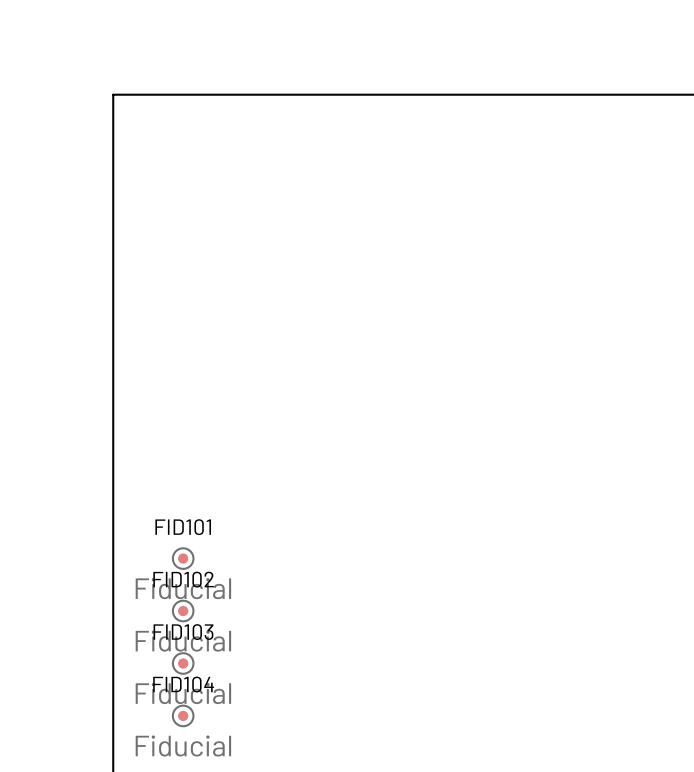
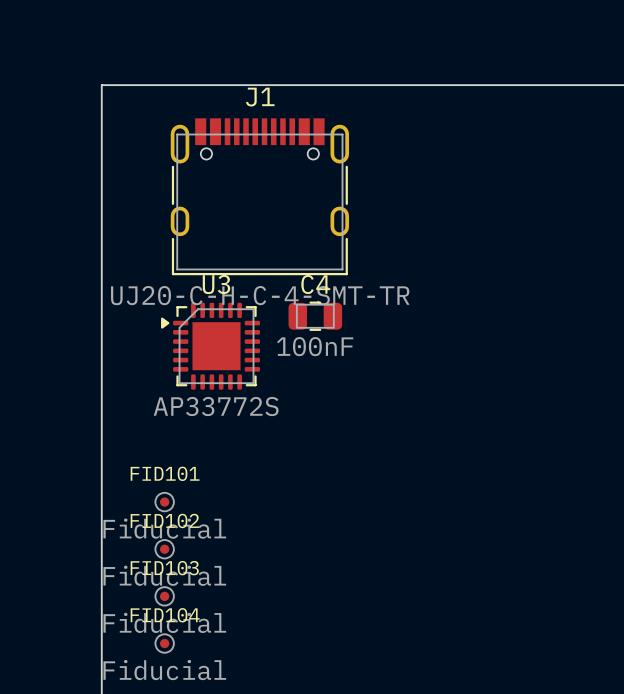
J1: none -> UJ20-C-H-C-4-SMT-TR (259, 196)
C4: none -> 100nF (315, 316)
U3: none -> AP33772S (210, 346)

